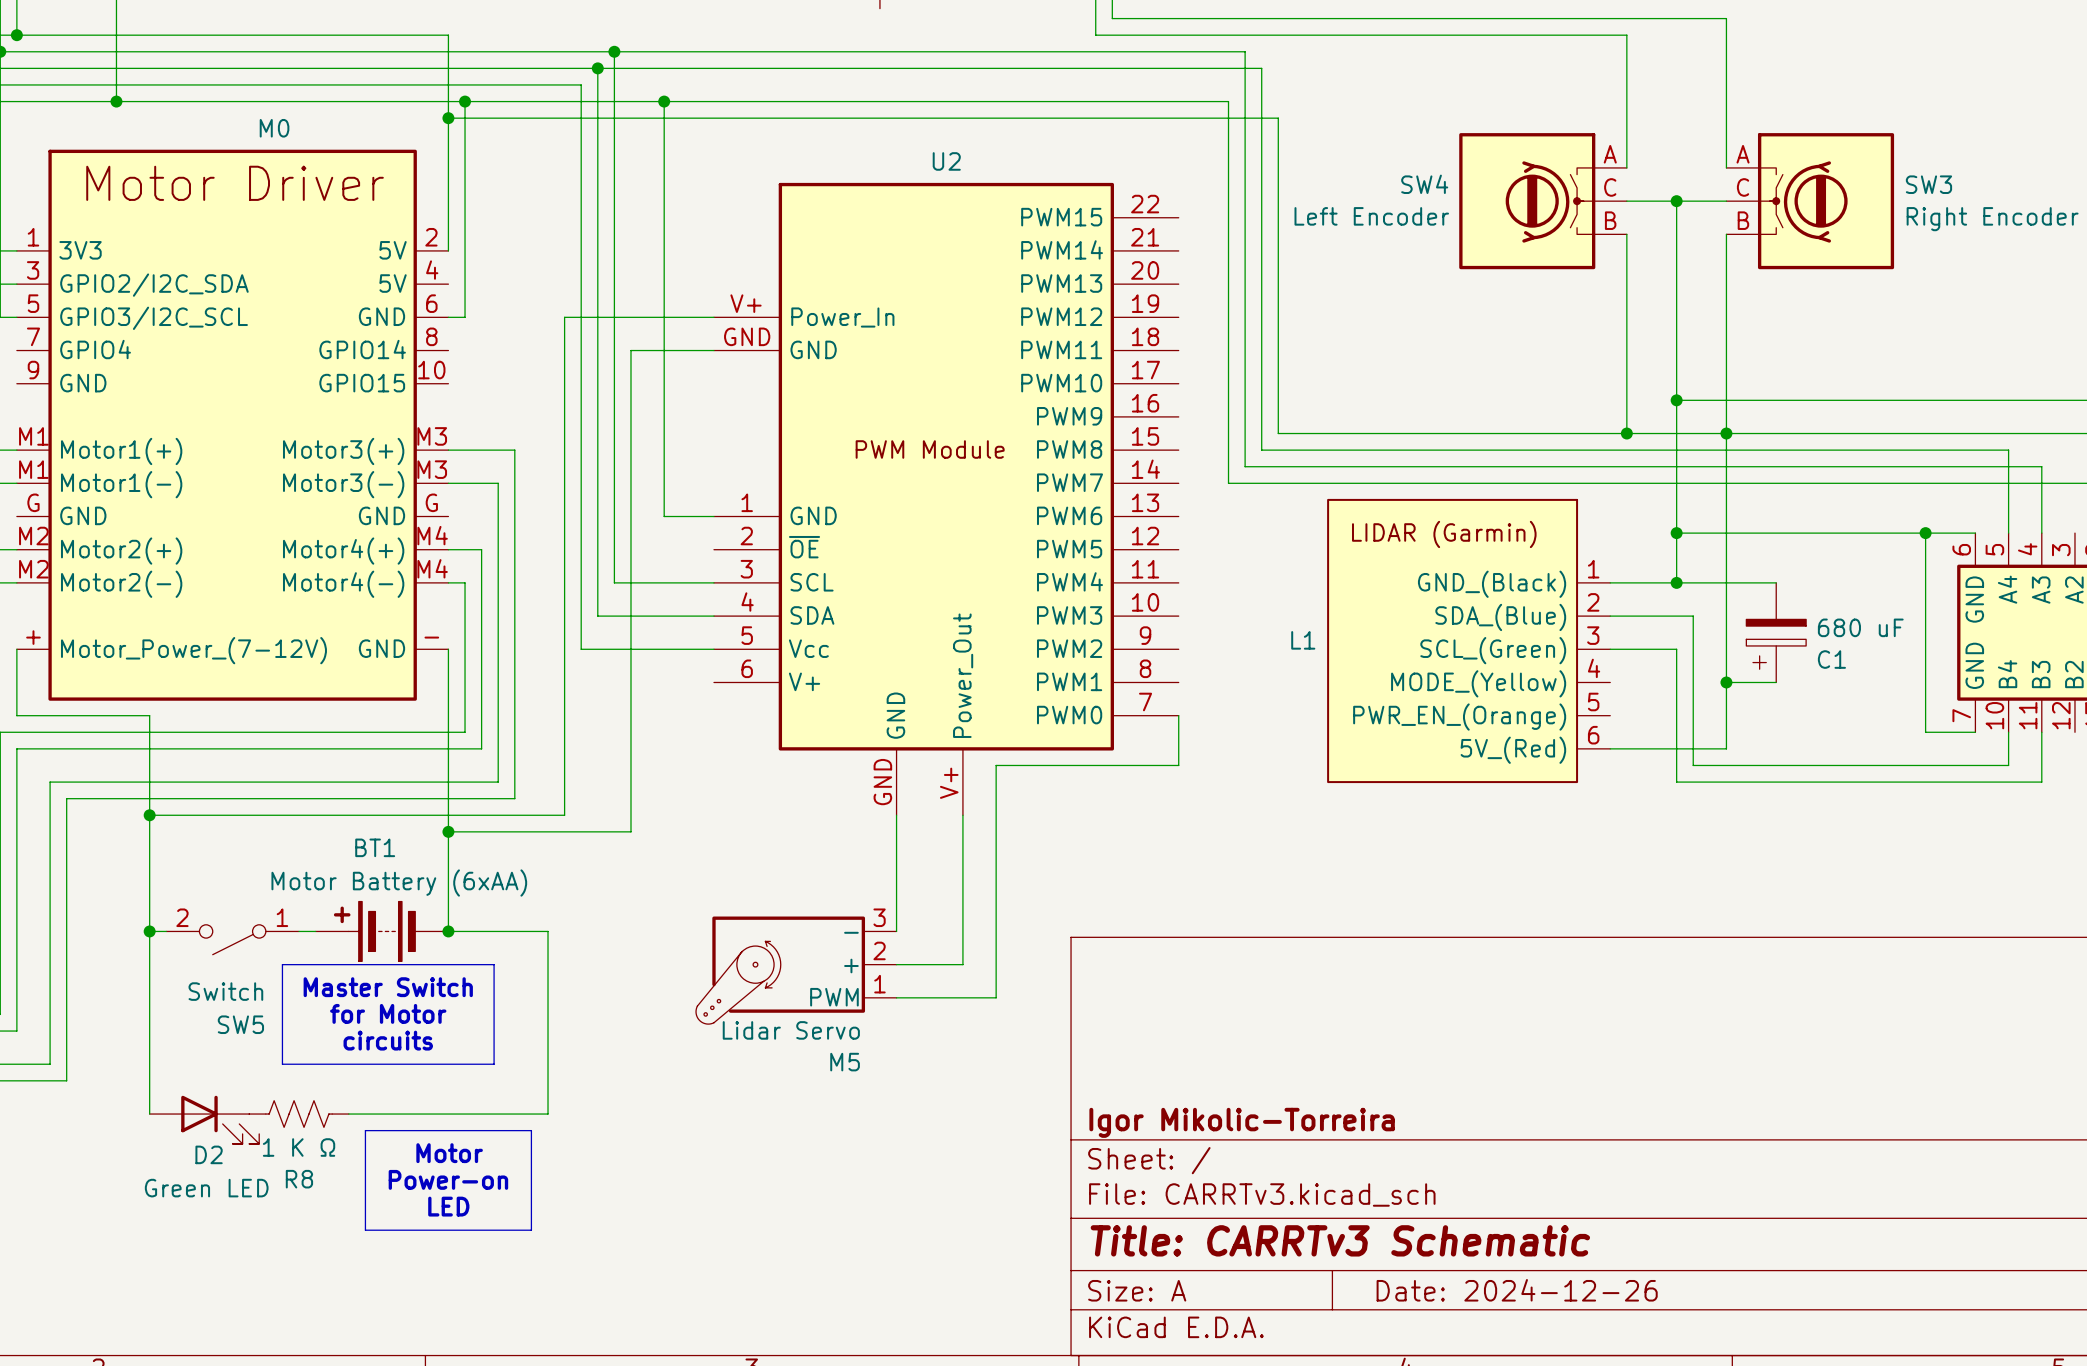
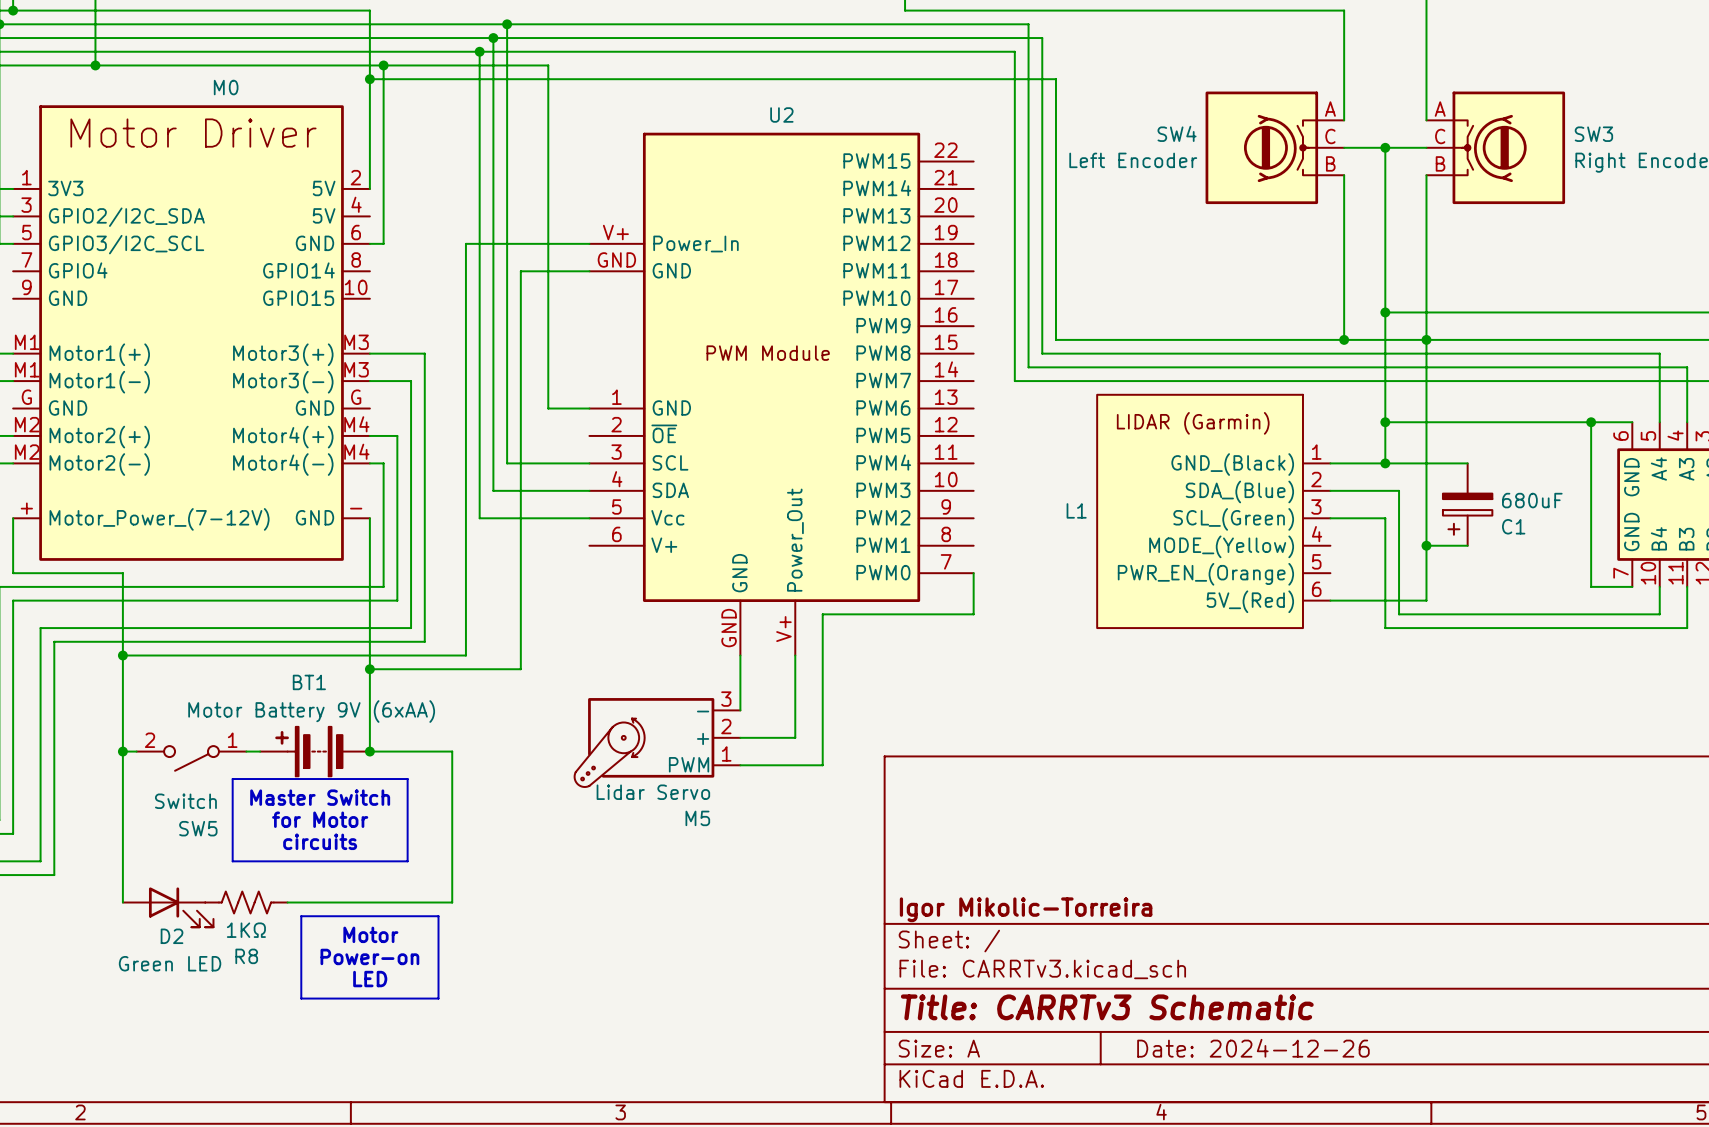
junction: none -> (479, 51)
wire: (664, 101) (1228, 101) -> (479, 51) (1014, 51) (1014, 65)
junction: (664, 101) -> none
C1 value: 680 uF (1860, 627) -> 680uF (1532, 500)
wire: (896, 881) (896, 931) -> none
BT1 value: Motor Battery (6xAA) (399, 883) -> Motor Battery 9V (6xAA) (311, 711)
wire: (962, 914) (962, 964) (896, 964) -> (795, 737) (740, 737)
wire: (996, 948) (996, 997) (896, 997) -> (822, 765) (740, 765)
M5 position: (796, 970) -> (657, 742)
R8 value: 1 K Ω (299, 1147) -> 1KΩ (246, 930)

